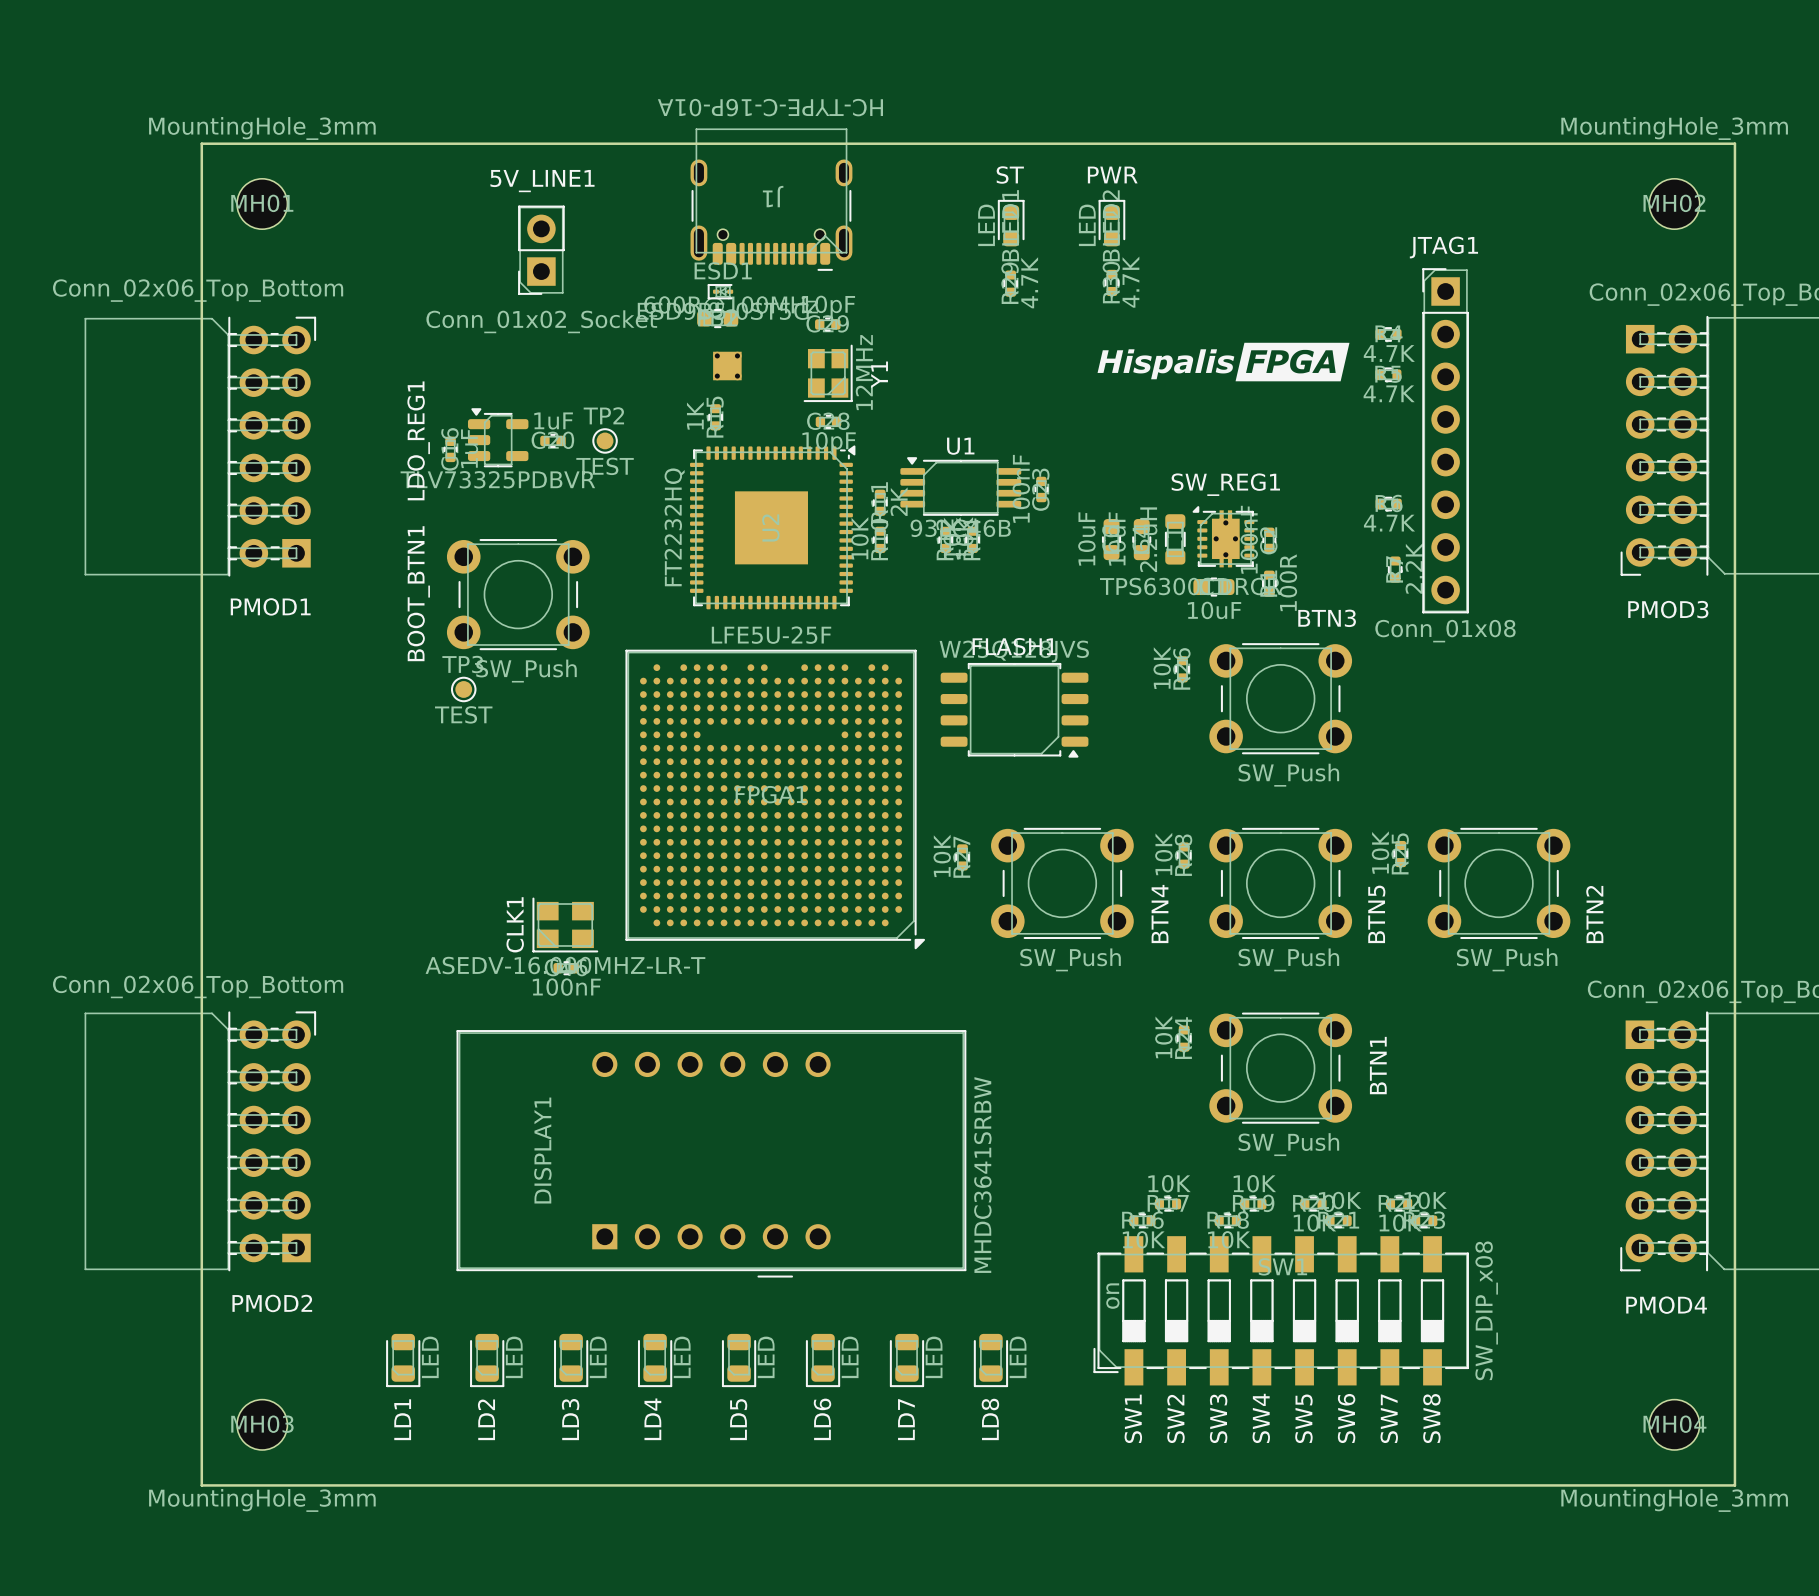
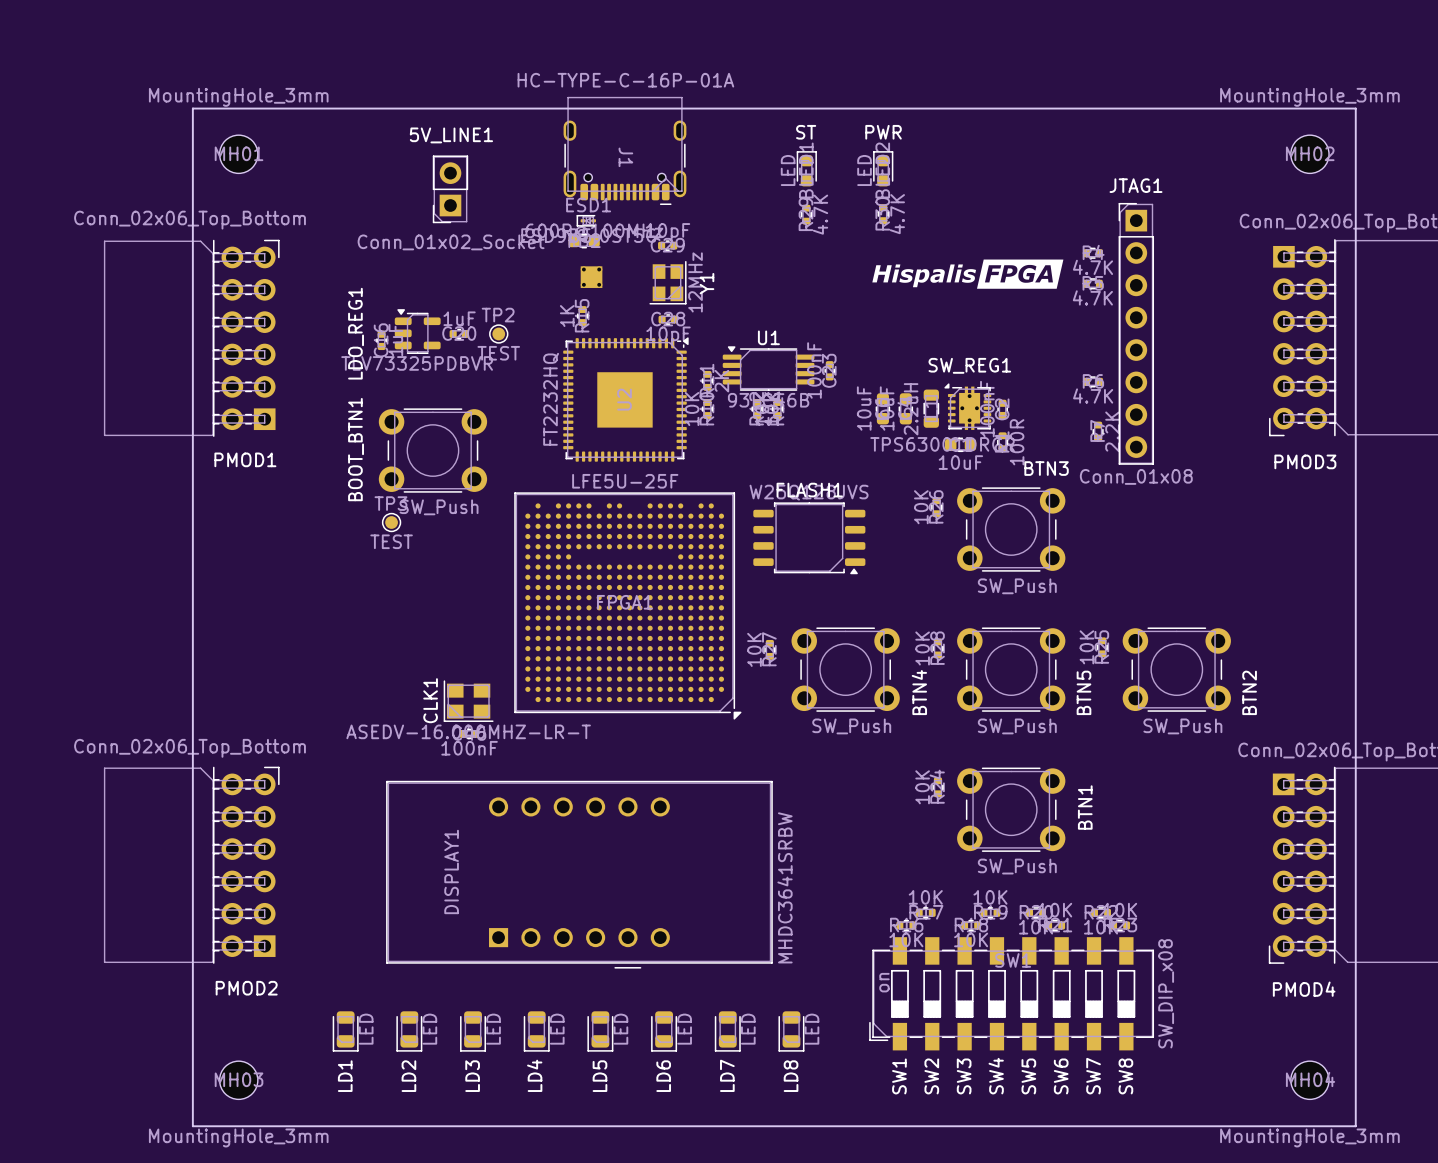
J1 value rotation: 0° (770, 107) -> 180° (625, 80)
J1 name rotation: 0° (773, 196) -> 90° counterclockwise (625, 157)

